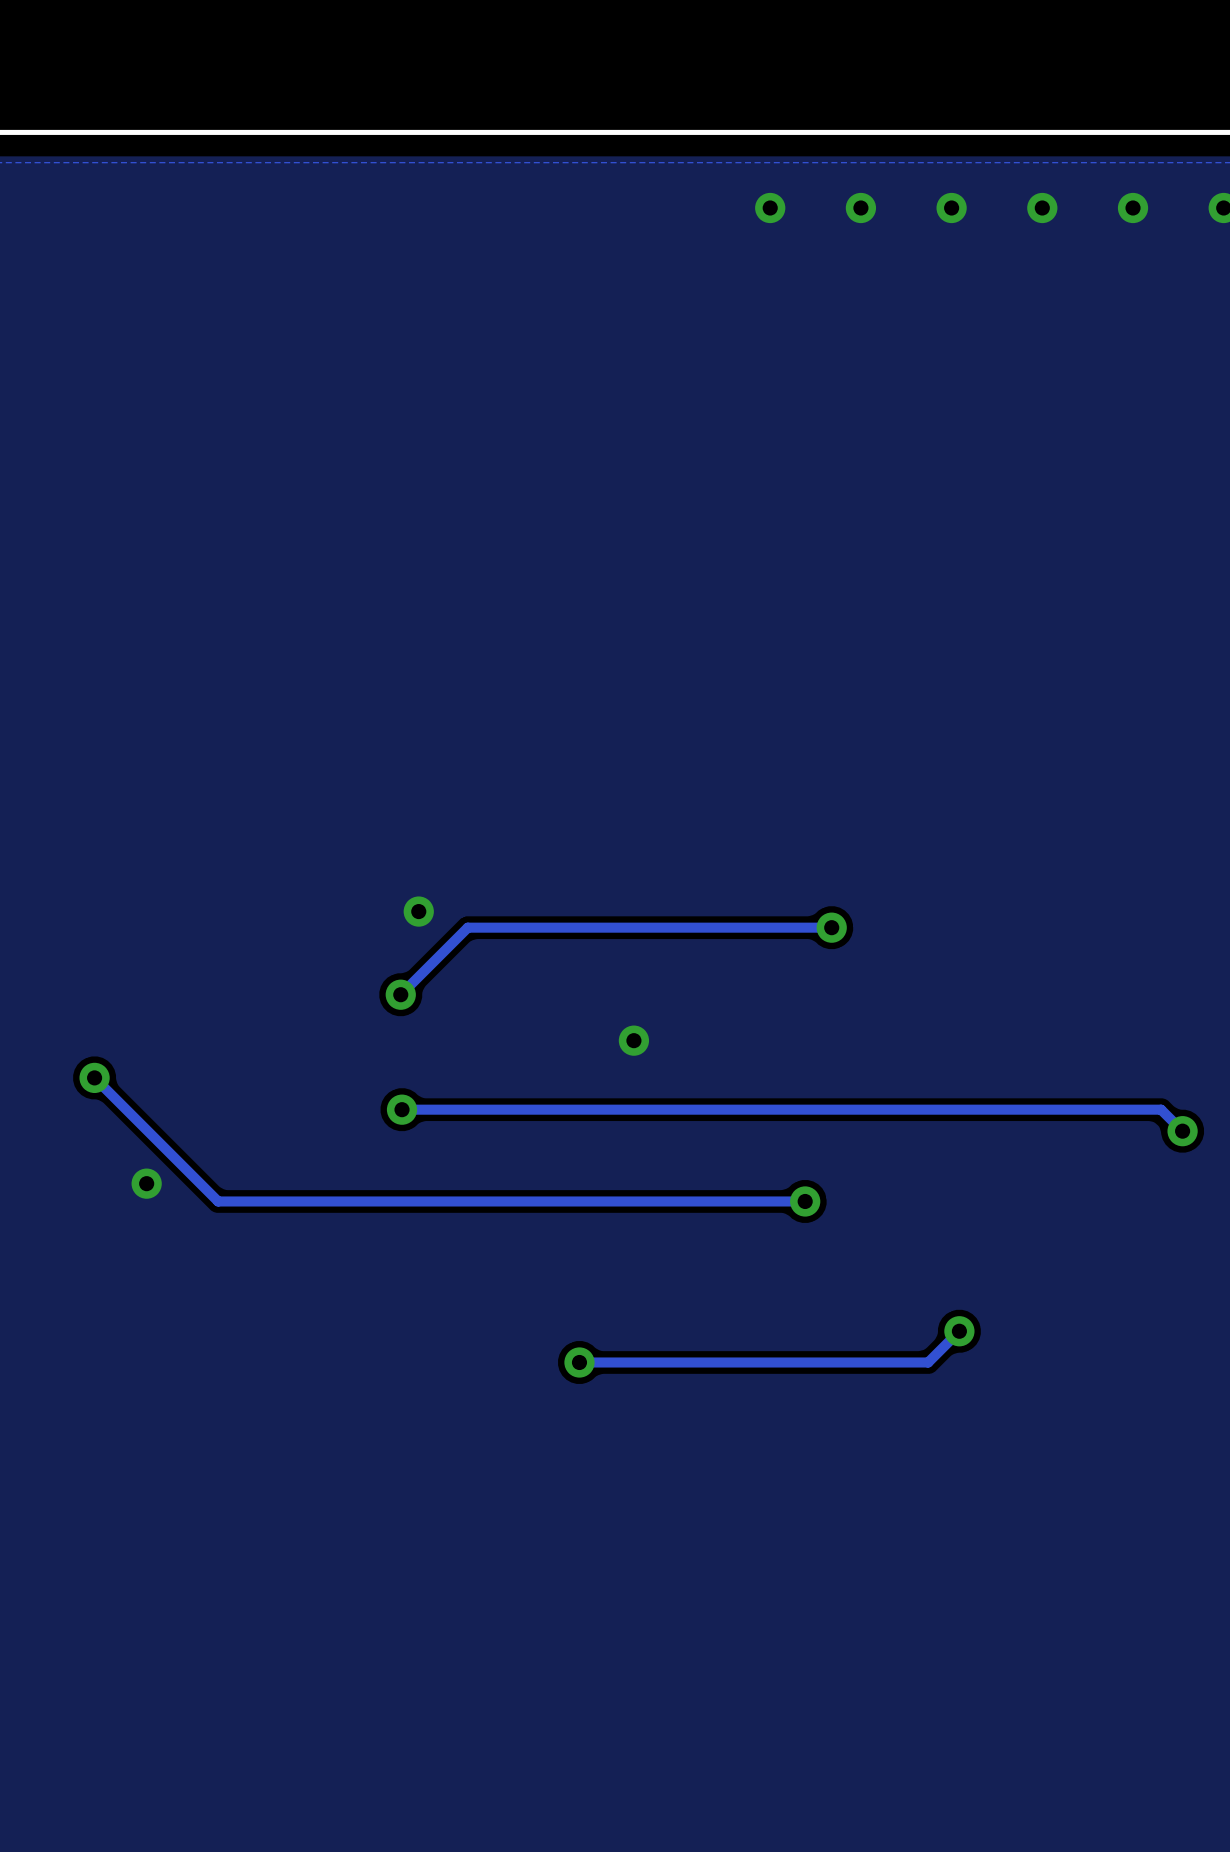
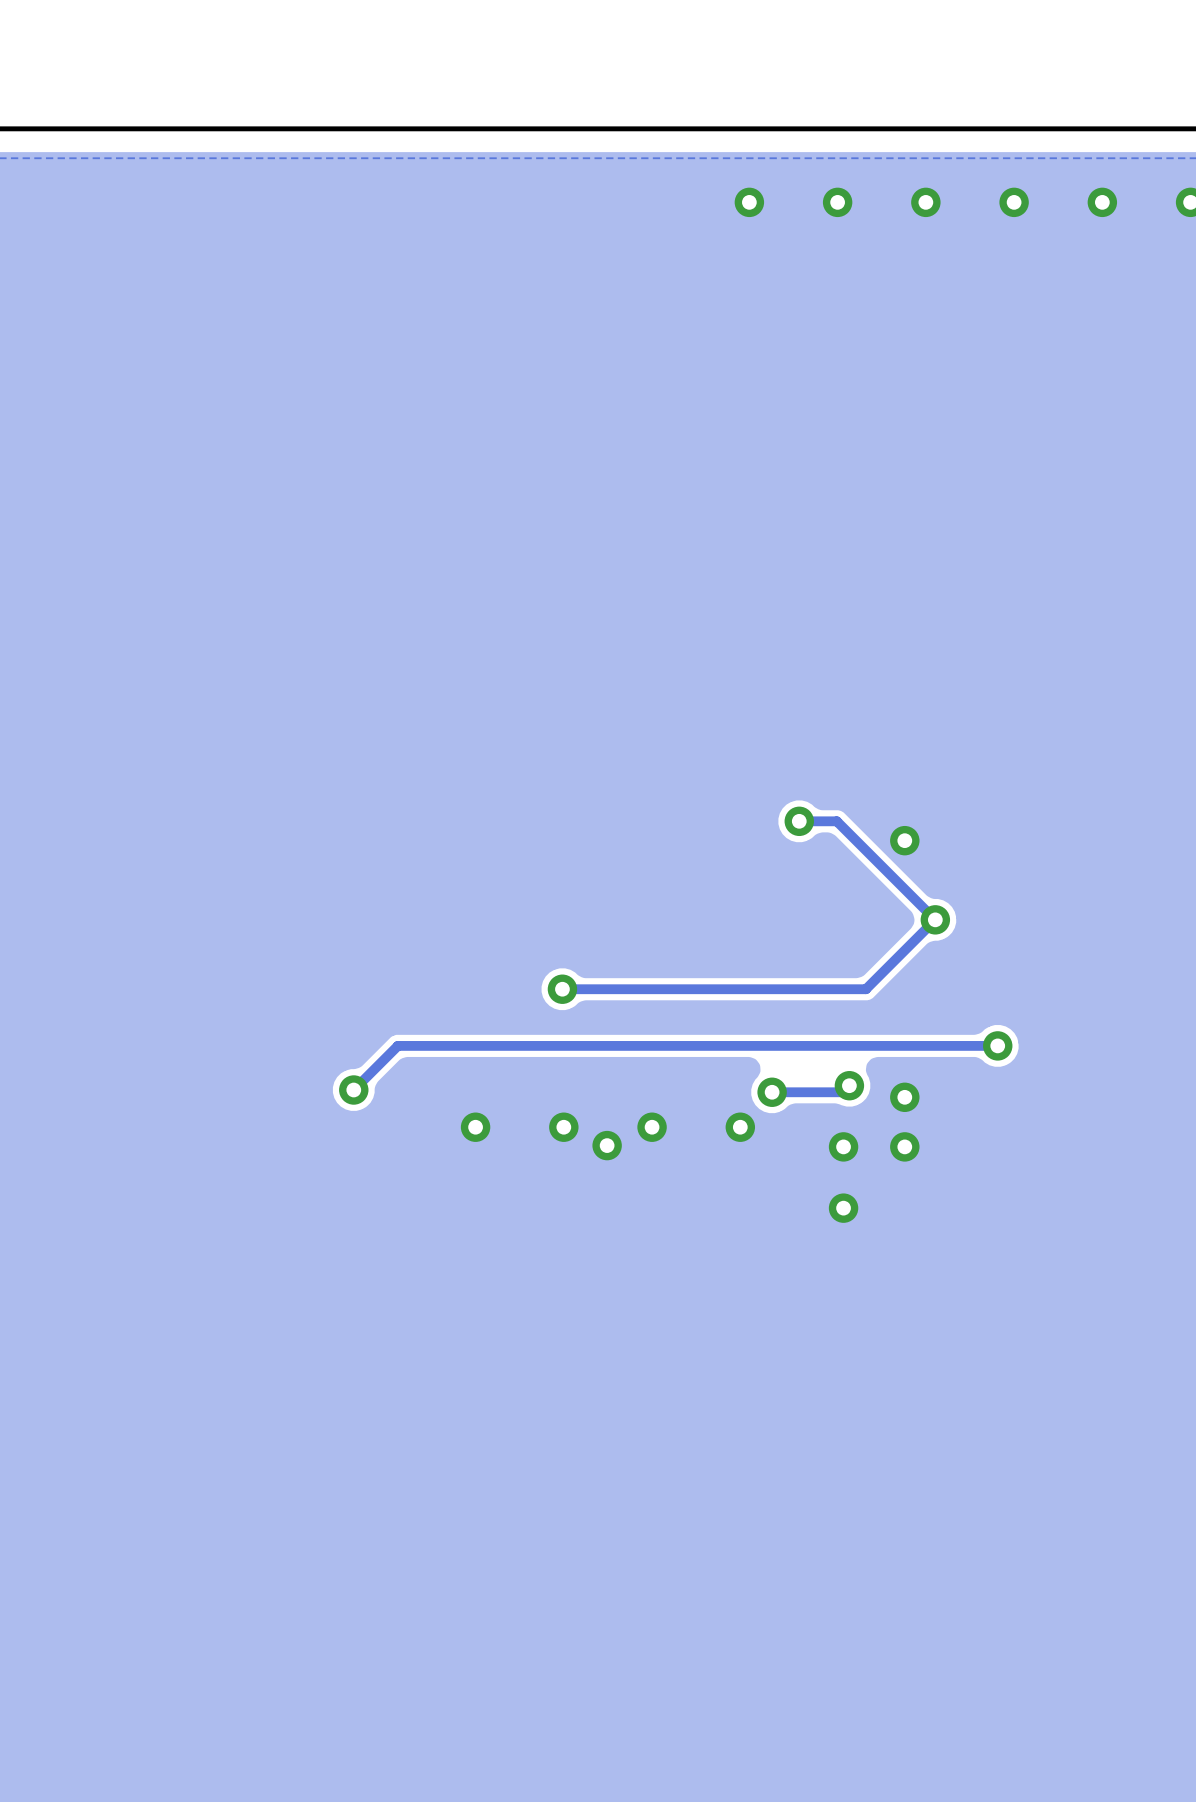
track: none -> (799, 821) (836, 821) (935, 919) (865, 989) (562, 989)
via: none -> (799, 821)
via: none -> (904, 840)
via: (418, 911) -> none
track: (831, 927) (467, 927) (400, 994) -> none
via: (831, 927) -> none
via: none -> (935, 919)
via: (400, 994) -> none
via position: (633, 1040) -> (562, 989)
track: none -> (997, 1045) (397, 1045) (353, 1090)
via: none -> (997, 1045)
track: (94, 1077) (218, 1201) (805, 1201) -> none
via: (94, 1077) -> none
track: (402, 1109) (1161, 1109) (1182, 1131) -> none
via position: (402, 1109) -> (353, 1090)
track: none -> (849, 1085) (842, 1092) (772, 1092)
via: none -> (849, 1085)
via: none -> (772, 1092)
via: none -> (904, 1097)
via: (1182, 1131) -> none
via: none -> (475, 1127)
via: none -> (563, 1127)
via: none -> (652, 1127)
via: none -> (740, 1127)
via: none -> (607, 1145)
via: none -> (843, 1146)
via: none -> (904, 1146)
via: (146, 1183) -> none
via: (805, 1201) -> none
via: none -> (843, 1208)
track: (959, 1331) (928, 1362) (579, 1362) -> none
via: (959, 1331) -> none
via: (579, 1362) -> none

